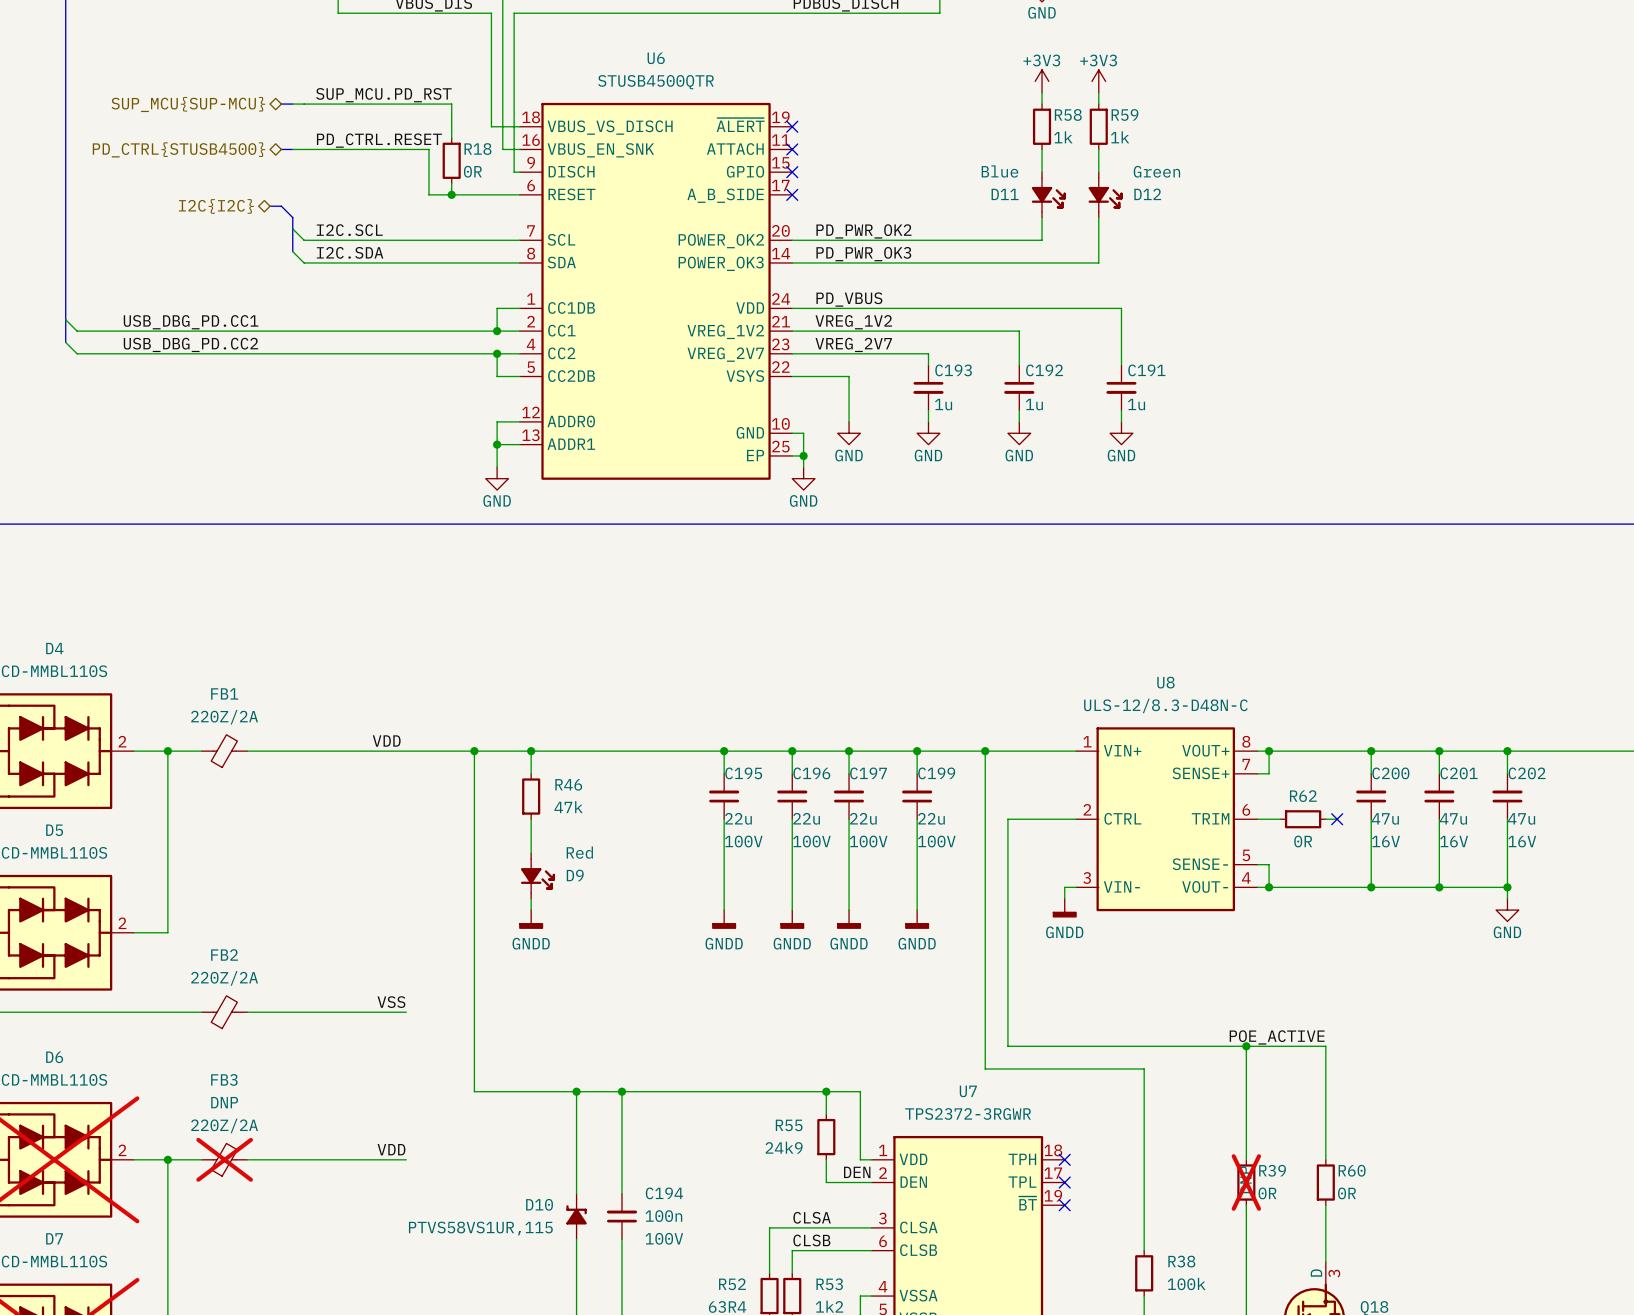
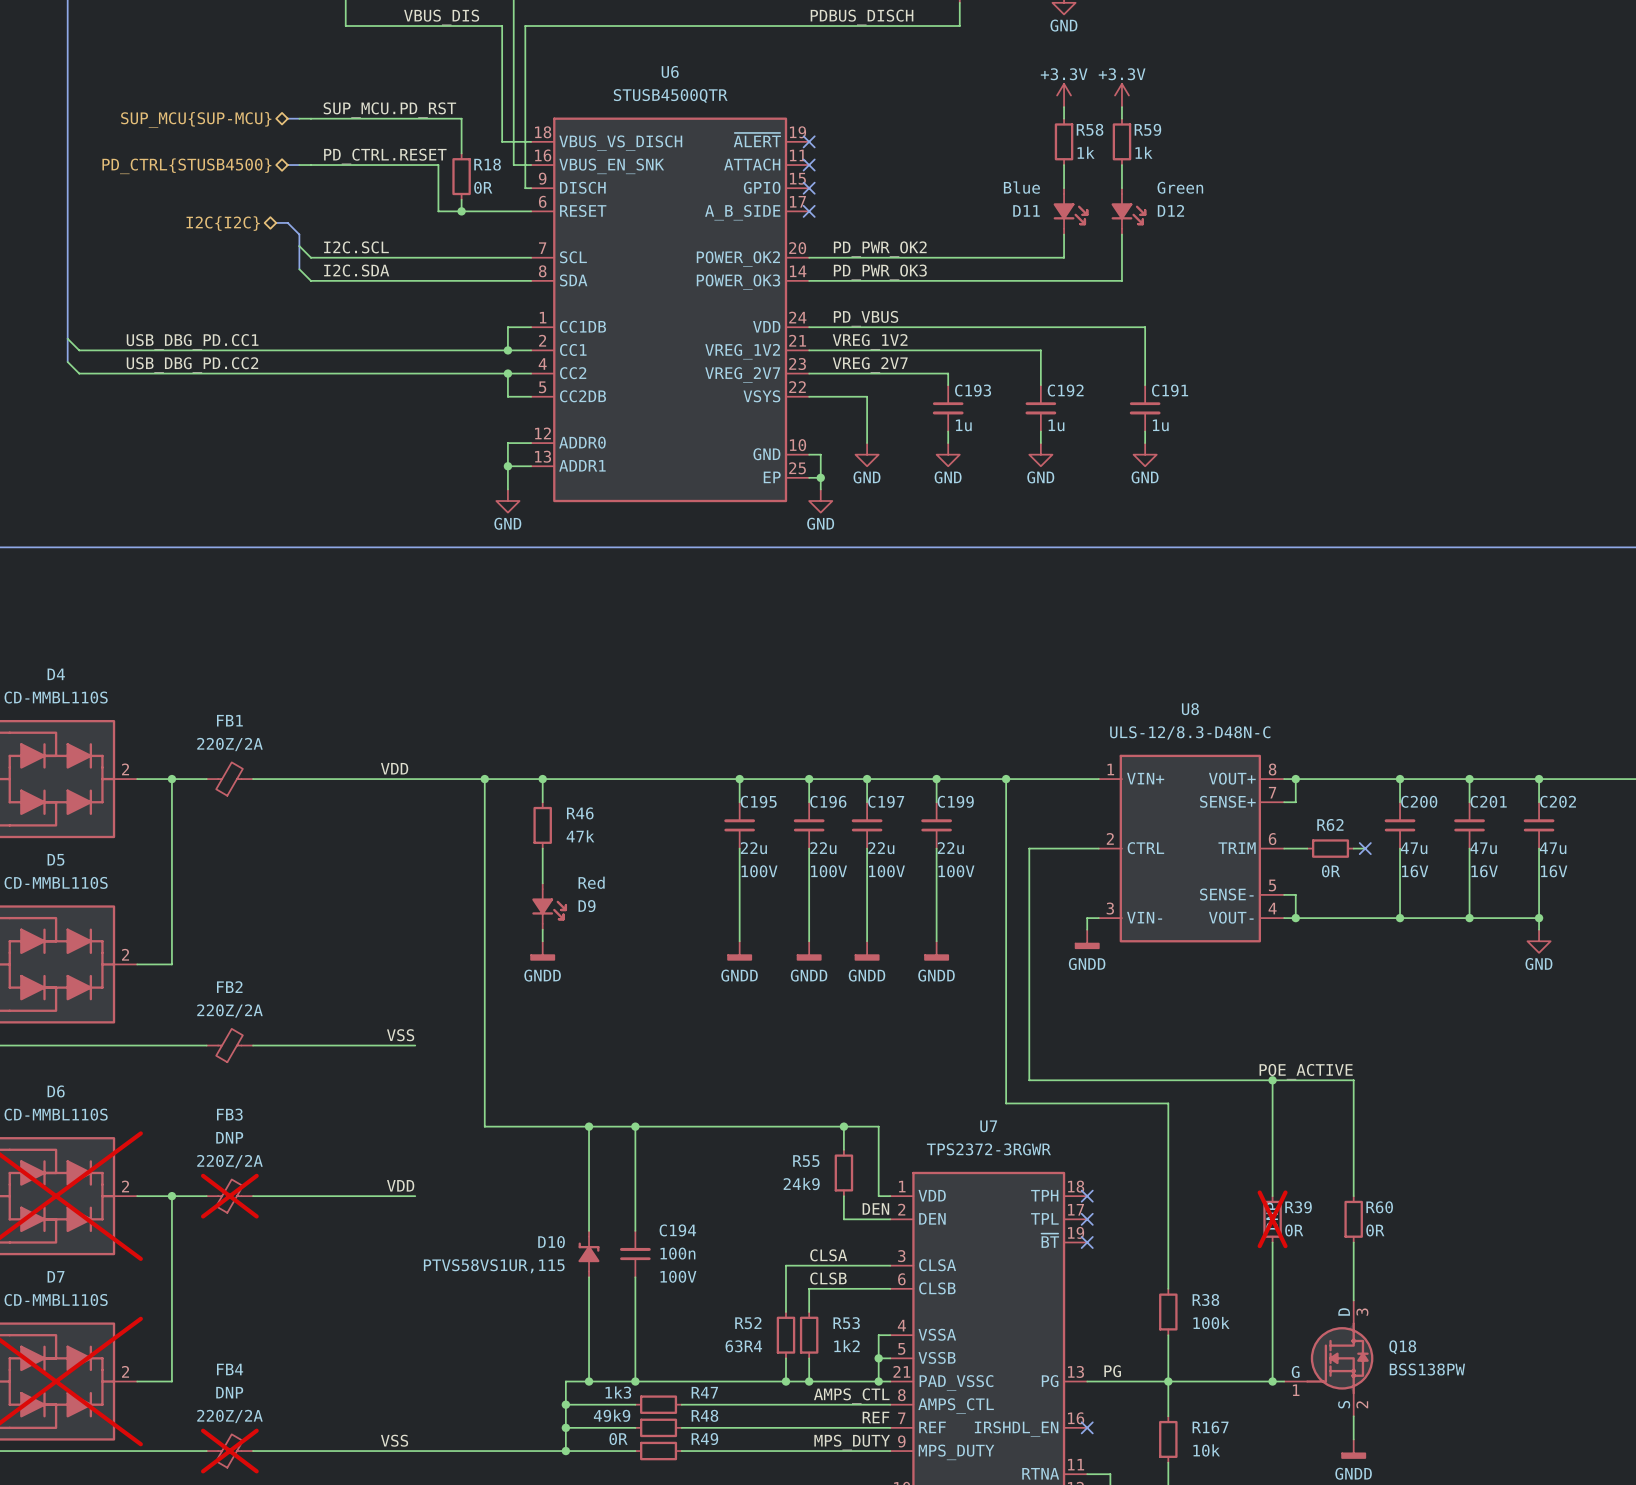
power symbol: +3V3 (1042, 81) -> +3.3V (1064, 95)
power symbol: +3V3 (1098, 81) -> +3.3V (1121, 95)

